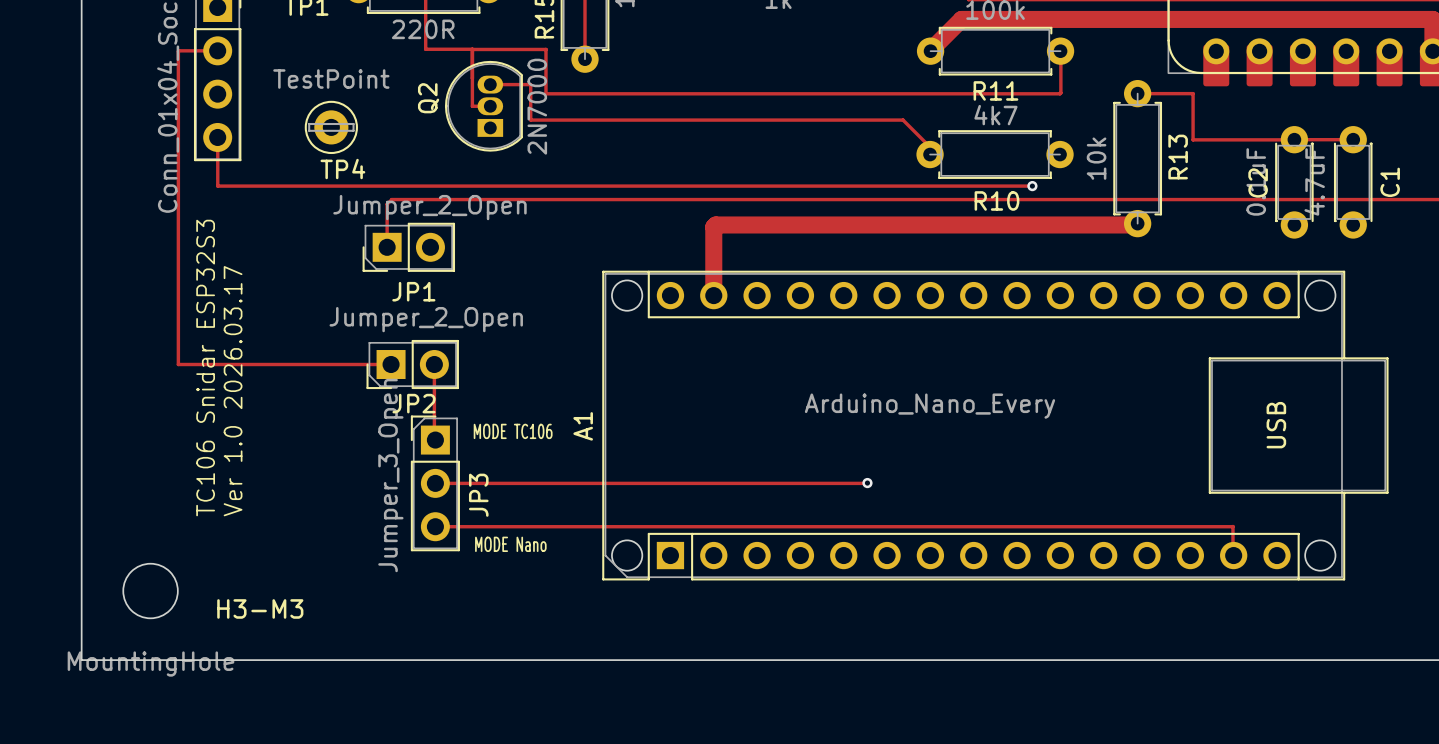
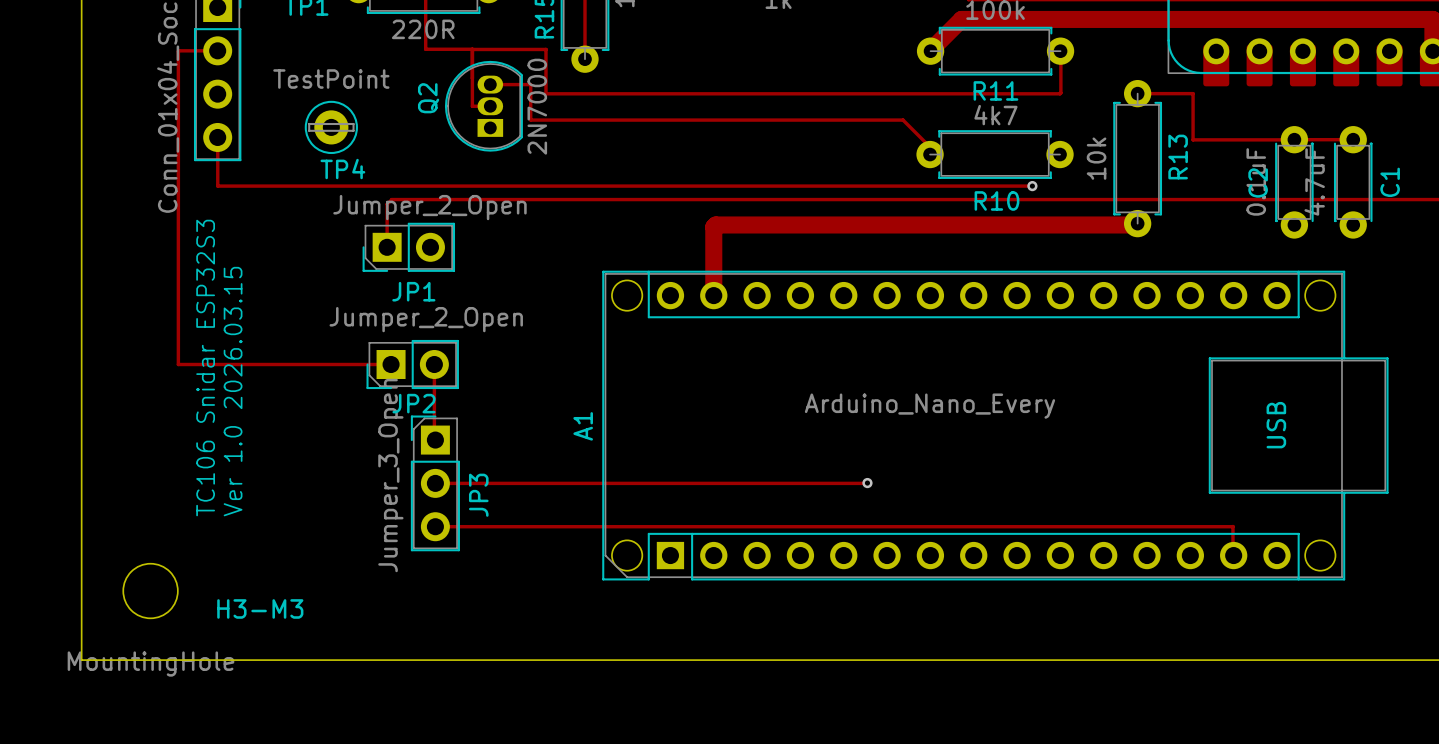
text: Ver 1.0 2026.03.17 (233, 391) -> Ver 1.0 2026.03.15 (233, 391)
text: MODE TC106 (513, 431) -> none
text: MODE Nano (510, 544) -> none

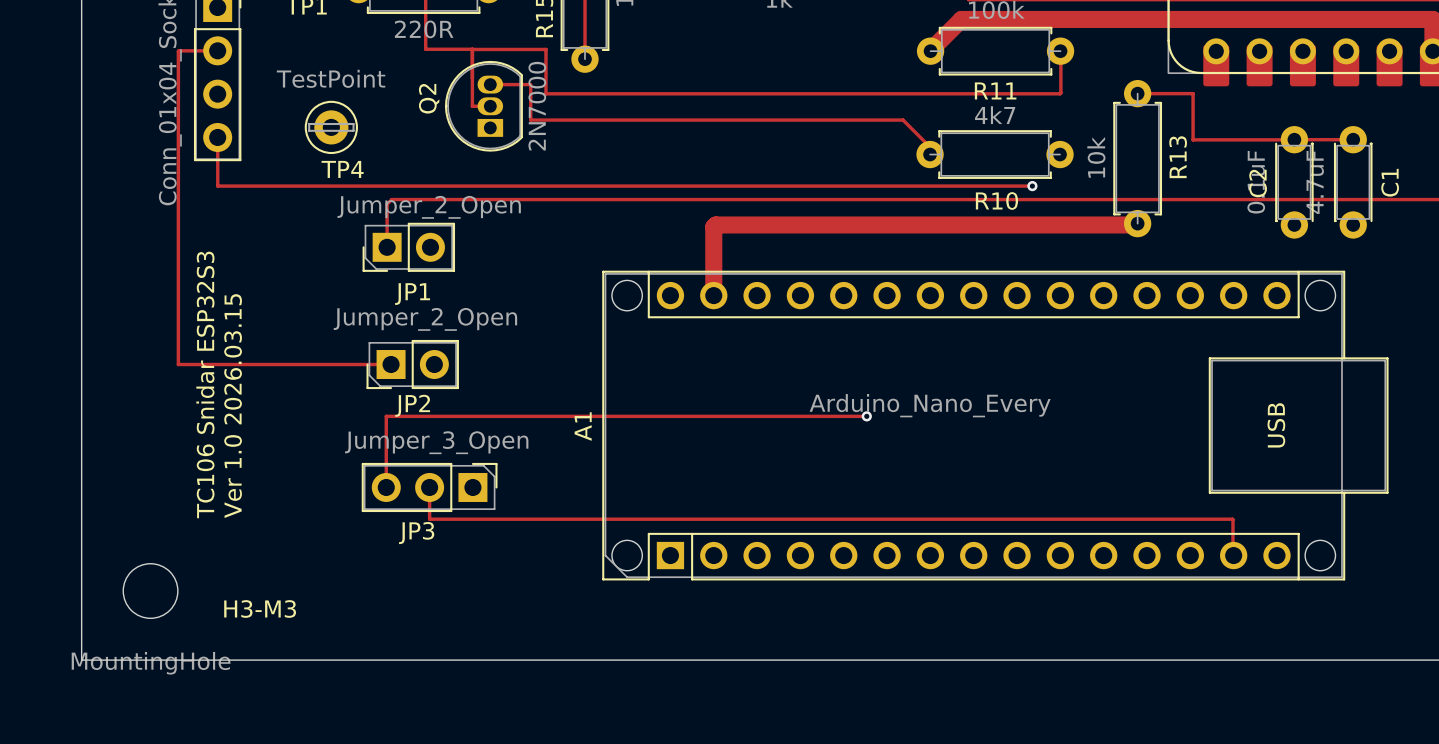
track: (435, 365) (434, 364) (435, 440) -> none
track: none -> (866, 416) (386, 416) (386, 487)
track: (435, 483) (865, 483) -> none
JP3 rotation: 0° (435, 483) -> 90° clockwise (429, 487)
via position: (867, 483) -> (866, 416)
track: (435, 526) (1232, 526) -> (436, 487) (429, 487) (429, 519) (1232, 519) (1232, 526)

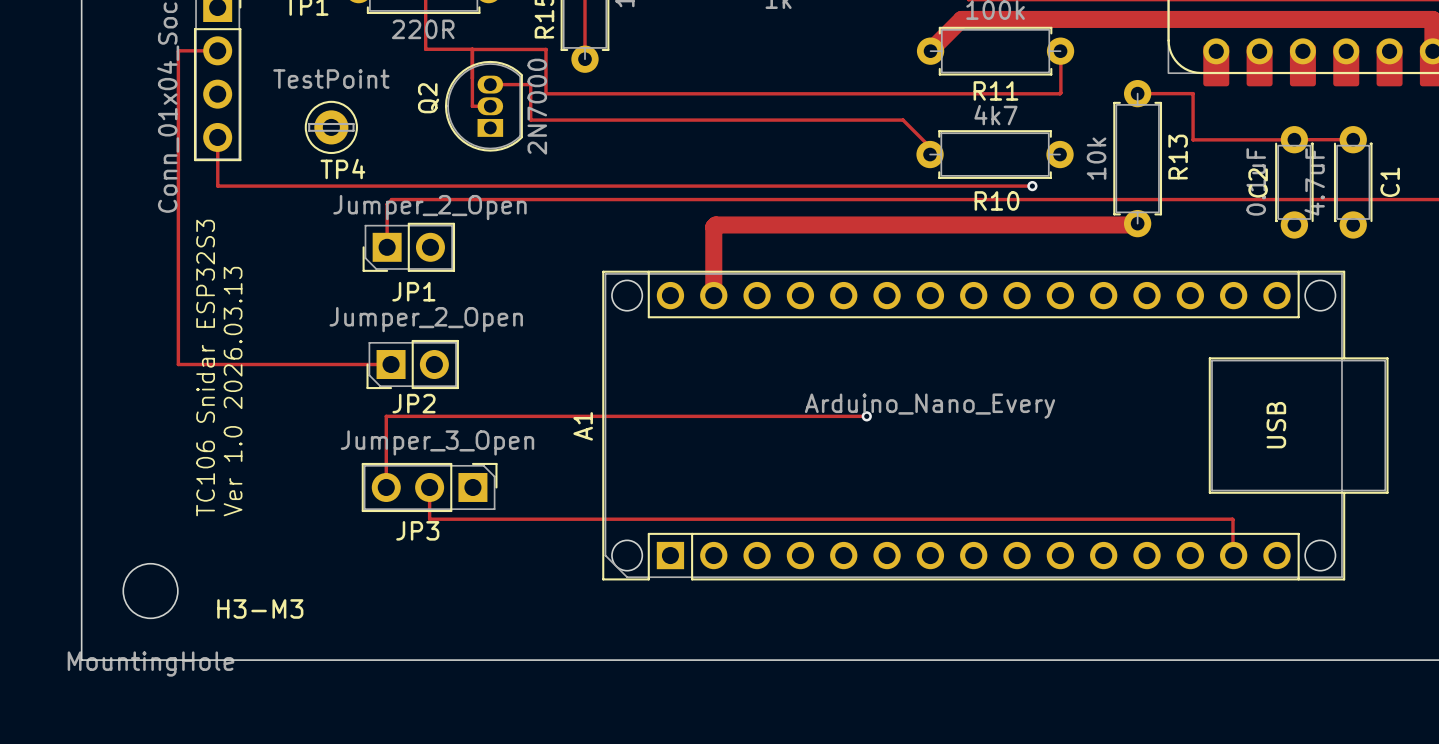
text: Ver 1.0 2026.03.15 (233, 406) -> Ver 1.0 2026.03.13 (233, 391)

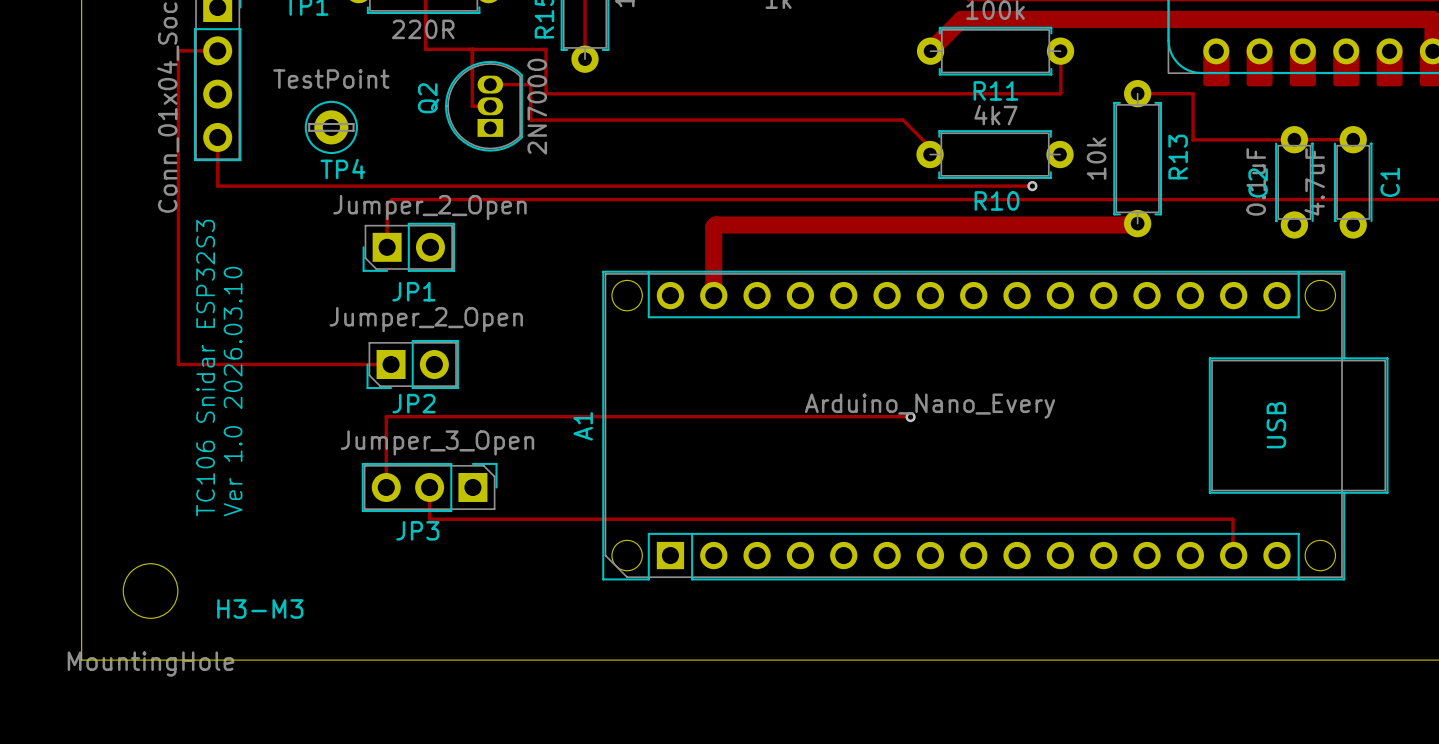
text: Ver 1.0 2026.03.13 (233, 391) -> Ver 1.0 2026.03.10 (233, 391)
track: (866, 416) (386, 416) -> (910, 417) (386, 416)
via position: (866, 416) -> (910, 417)

